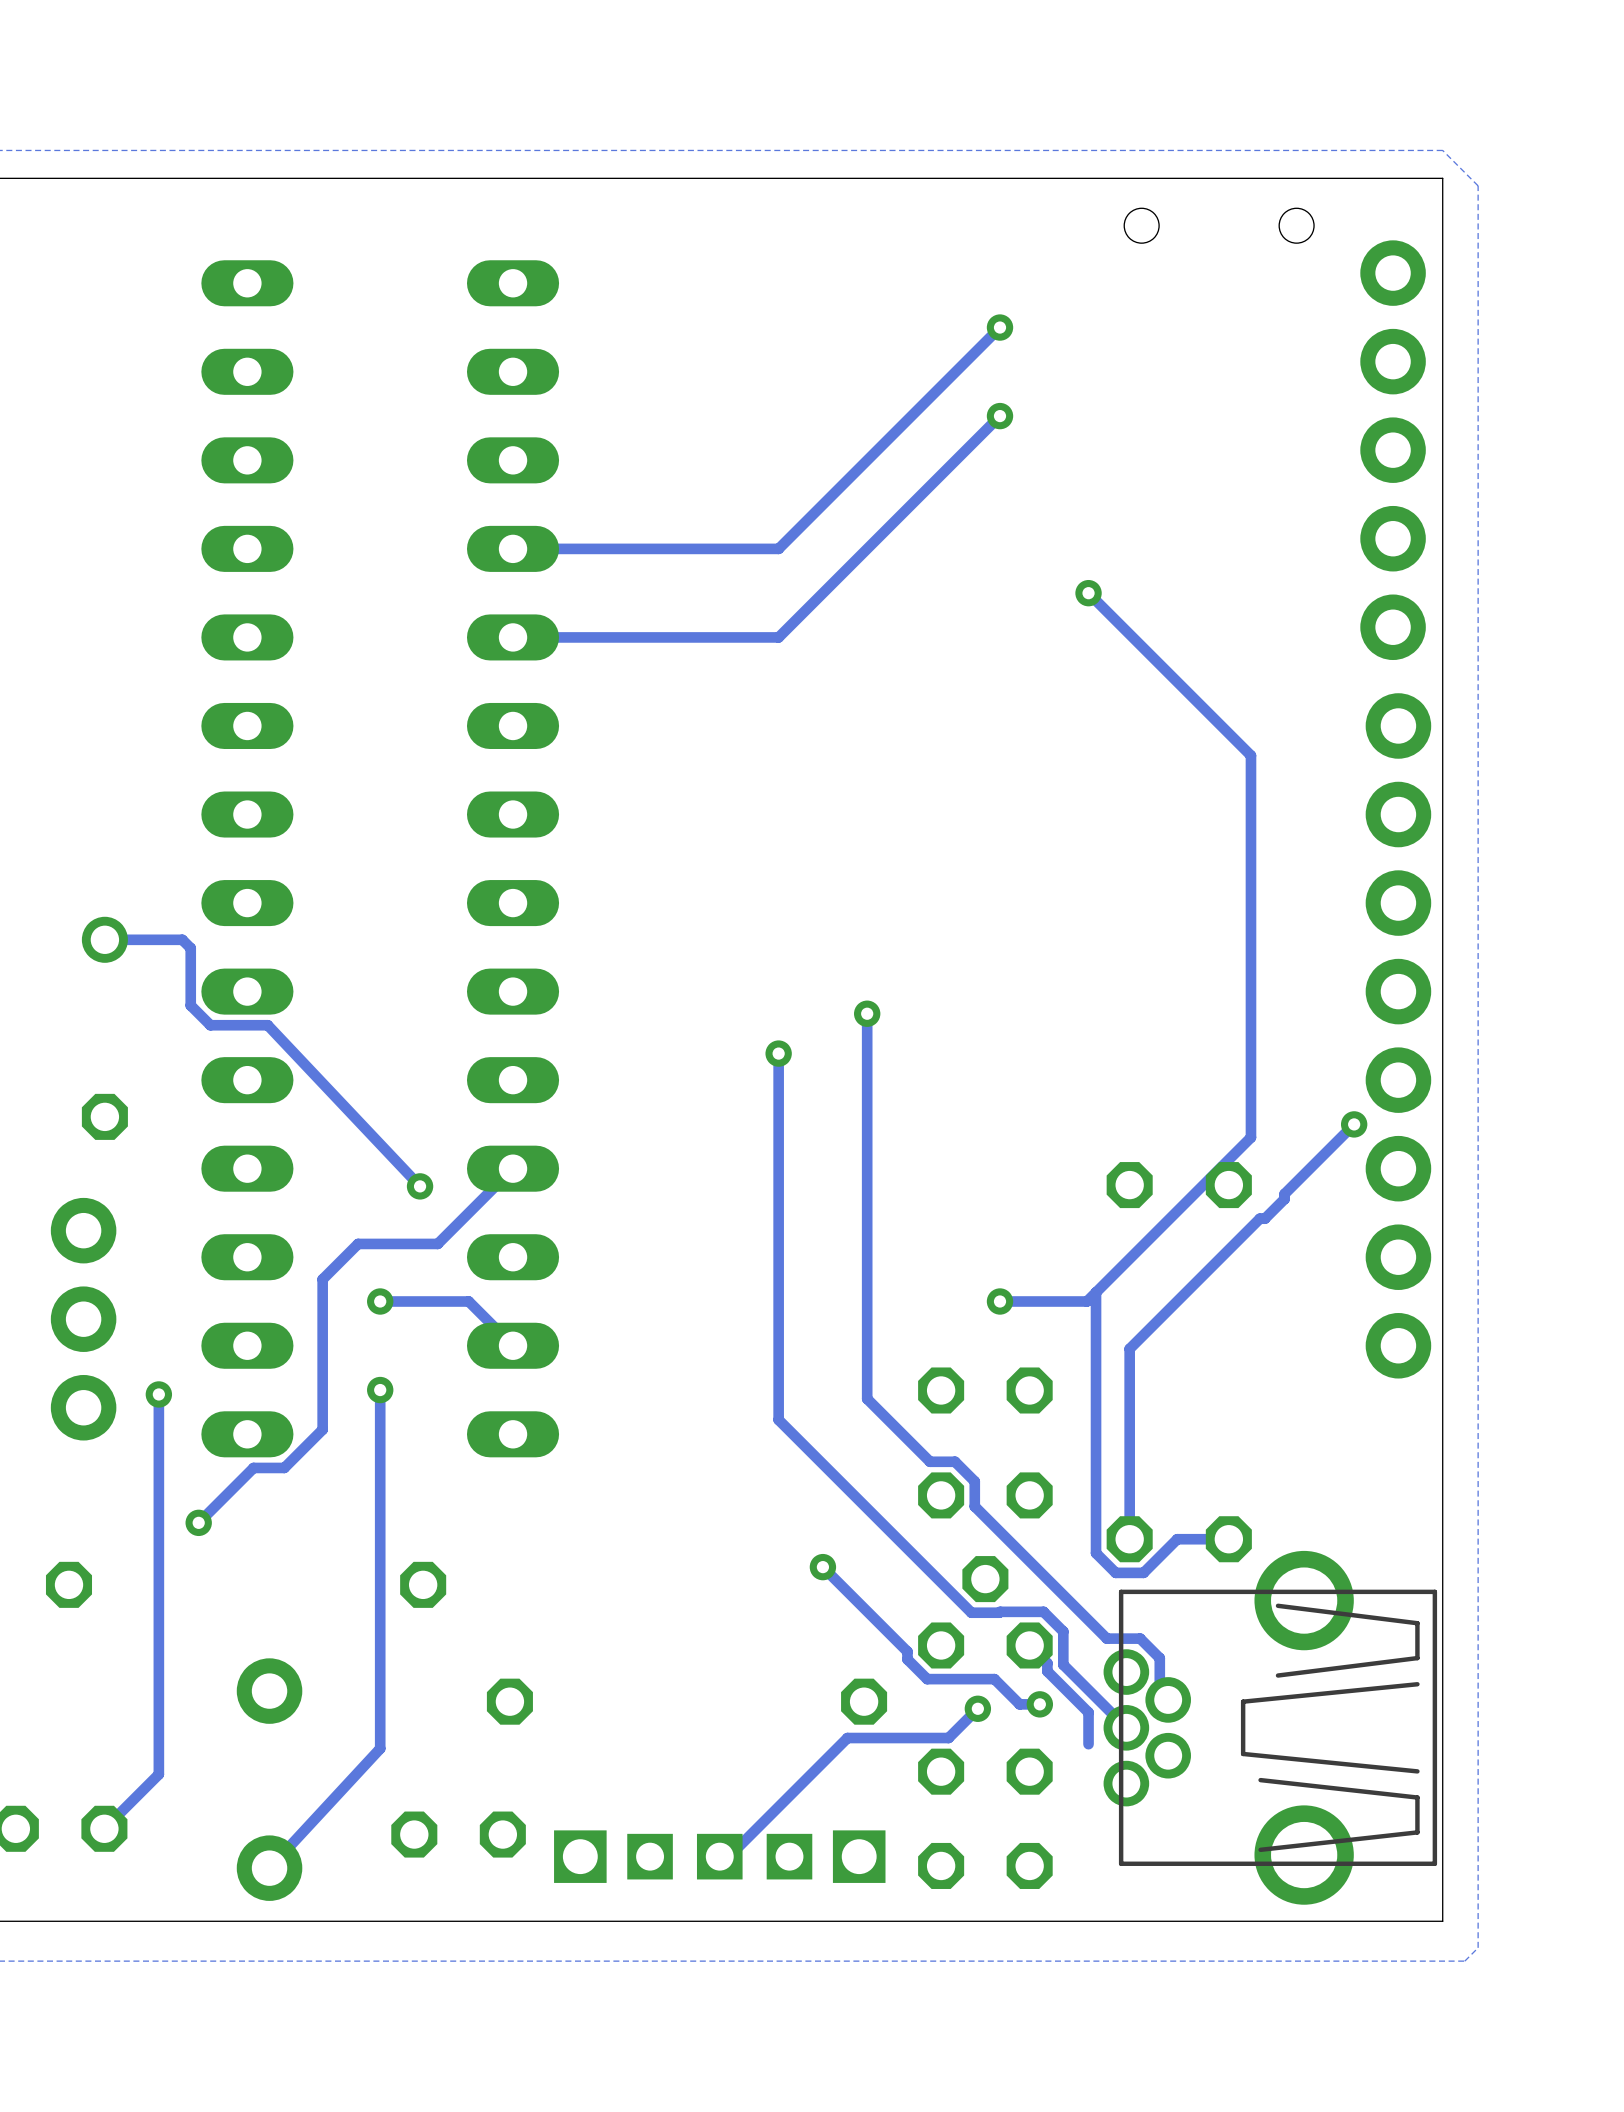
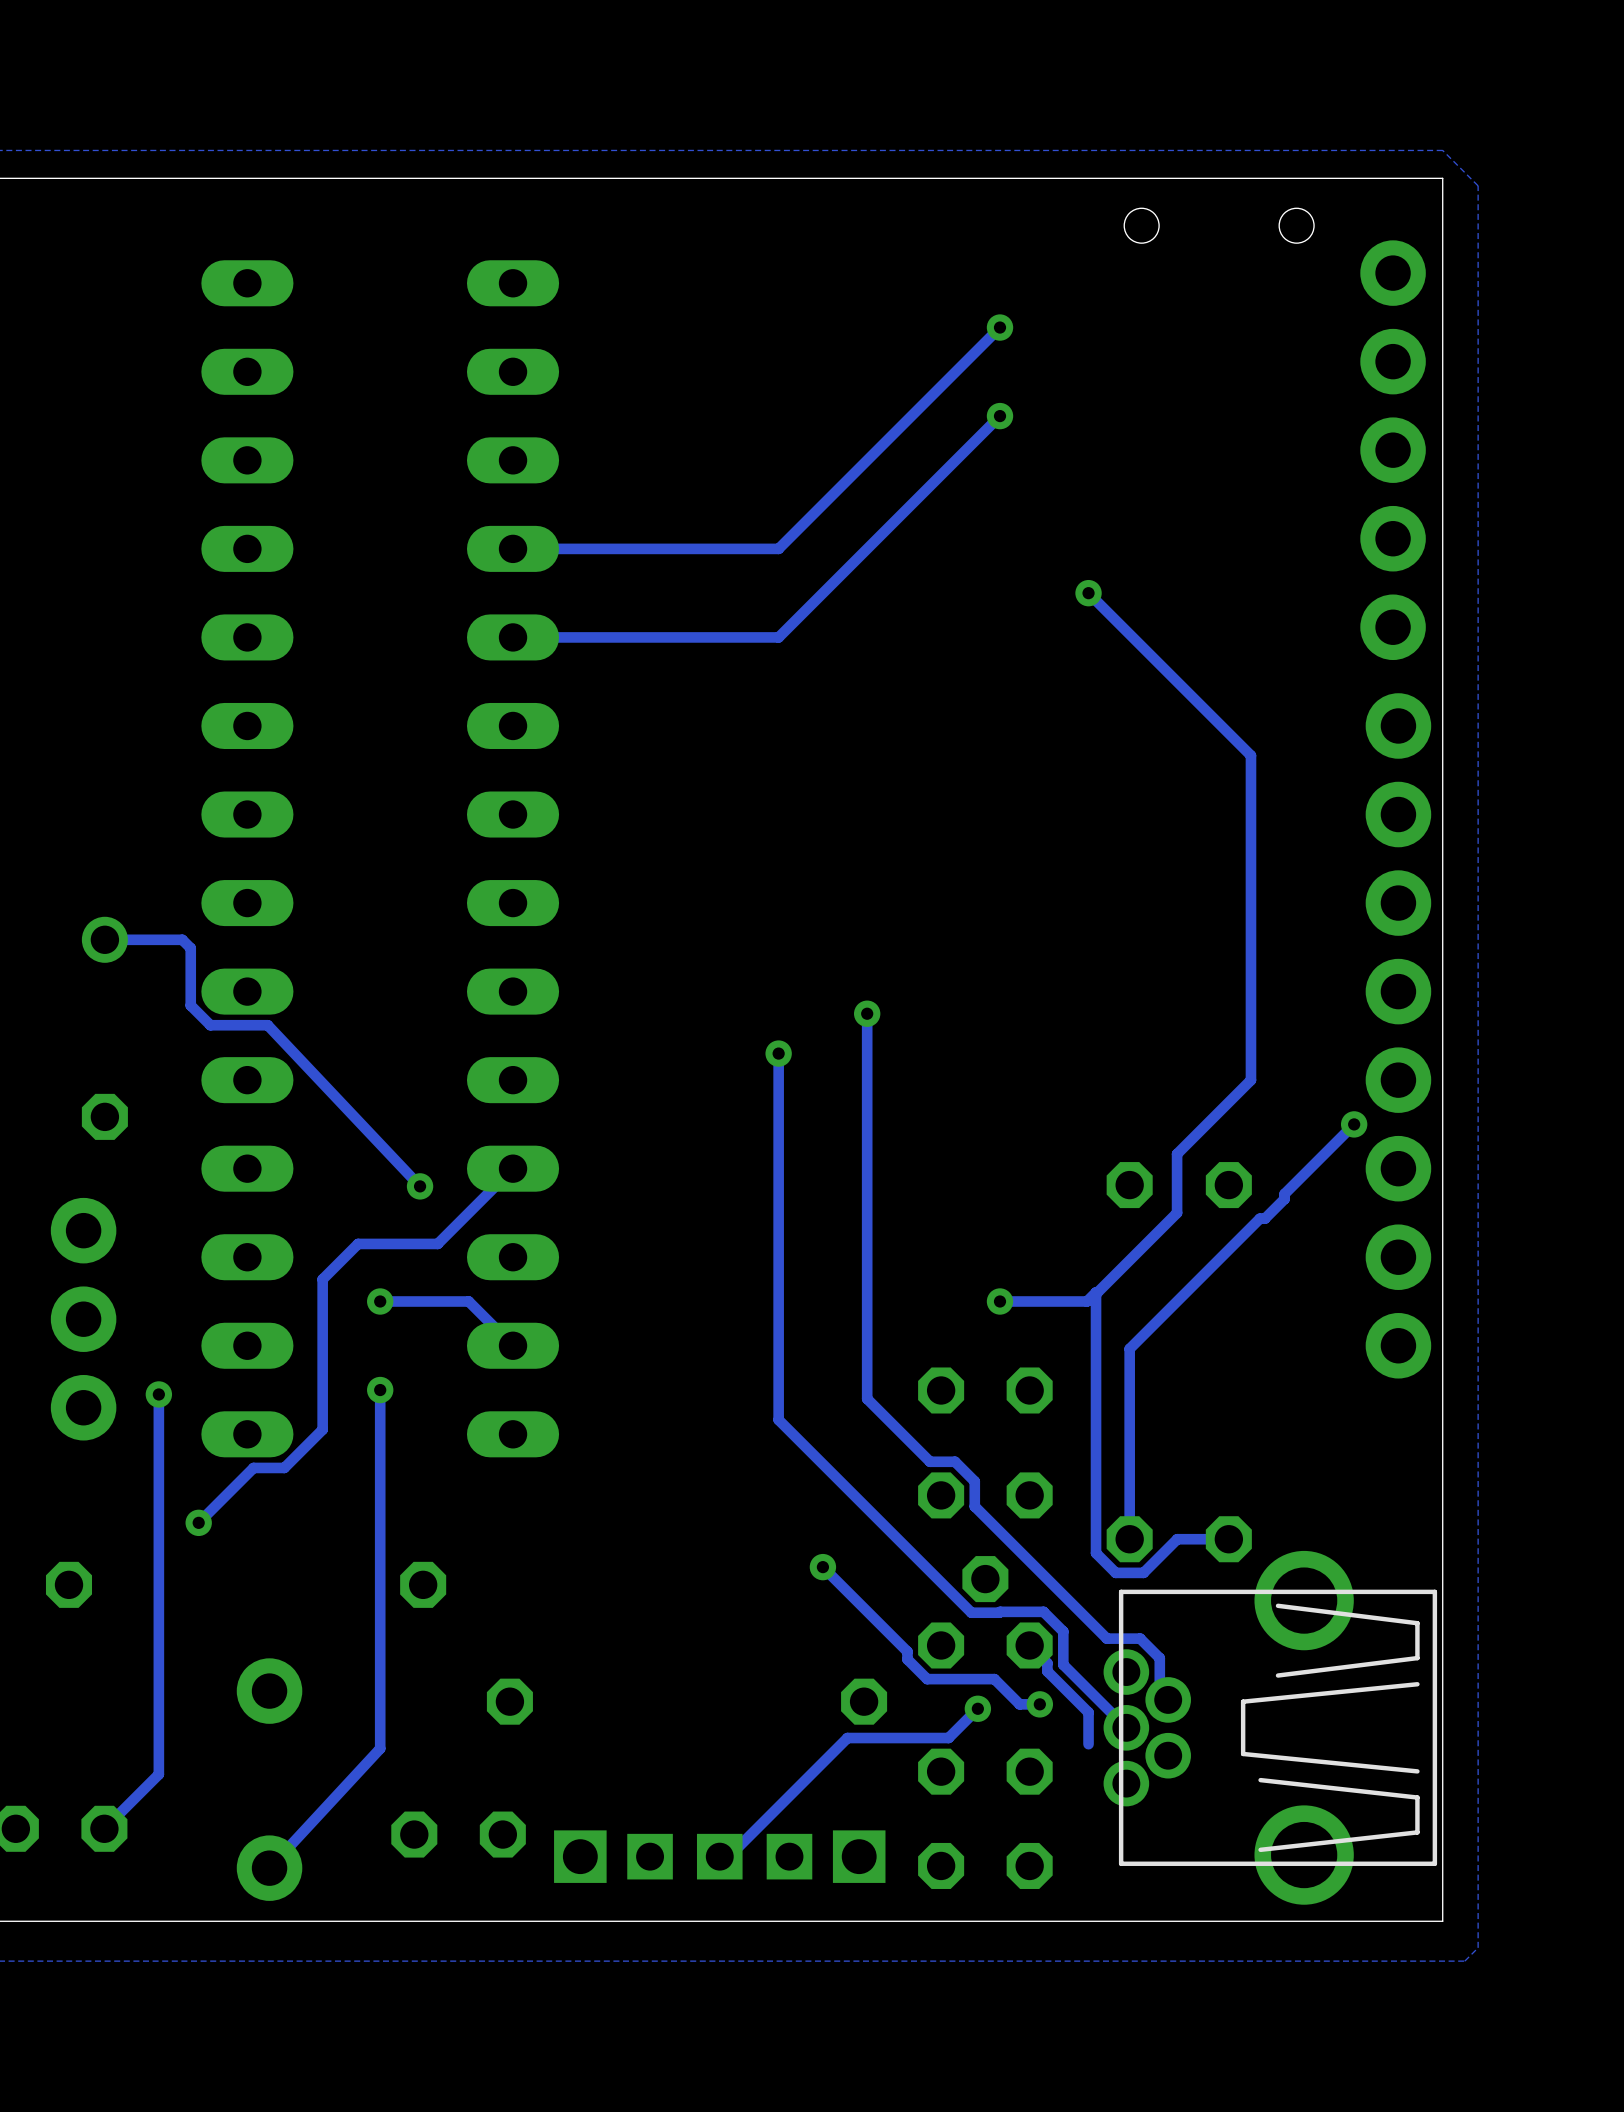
track: (1250, 1080) (1250, 1137) (1096, 1292) -> (1250, 1080) (1177, 1154) (1177, 1212) (1096, 1292)

